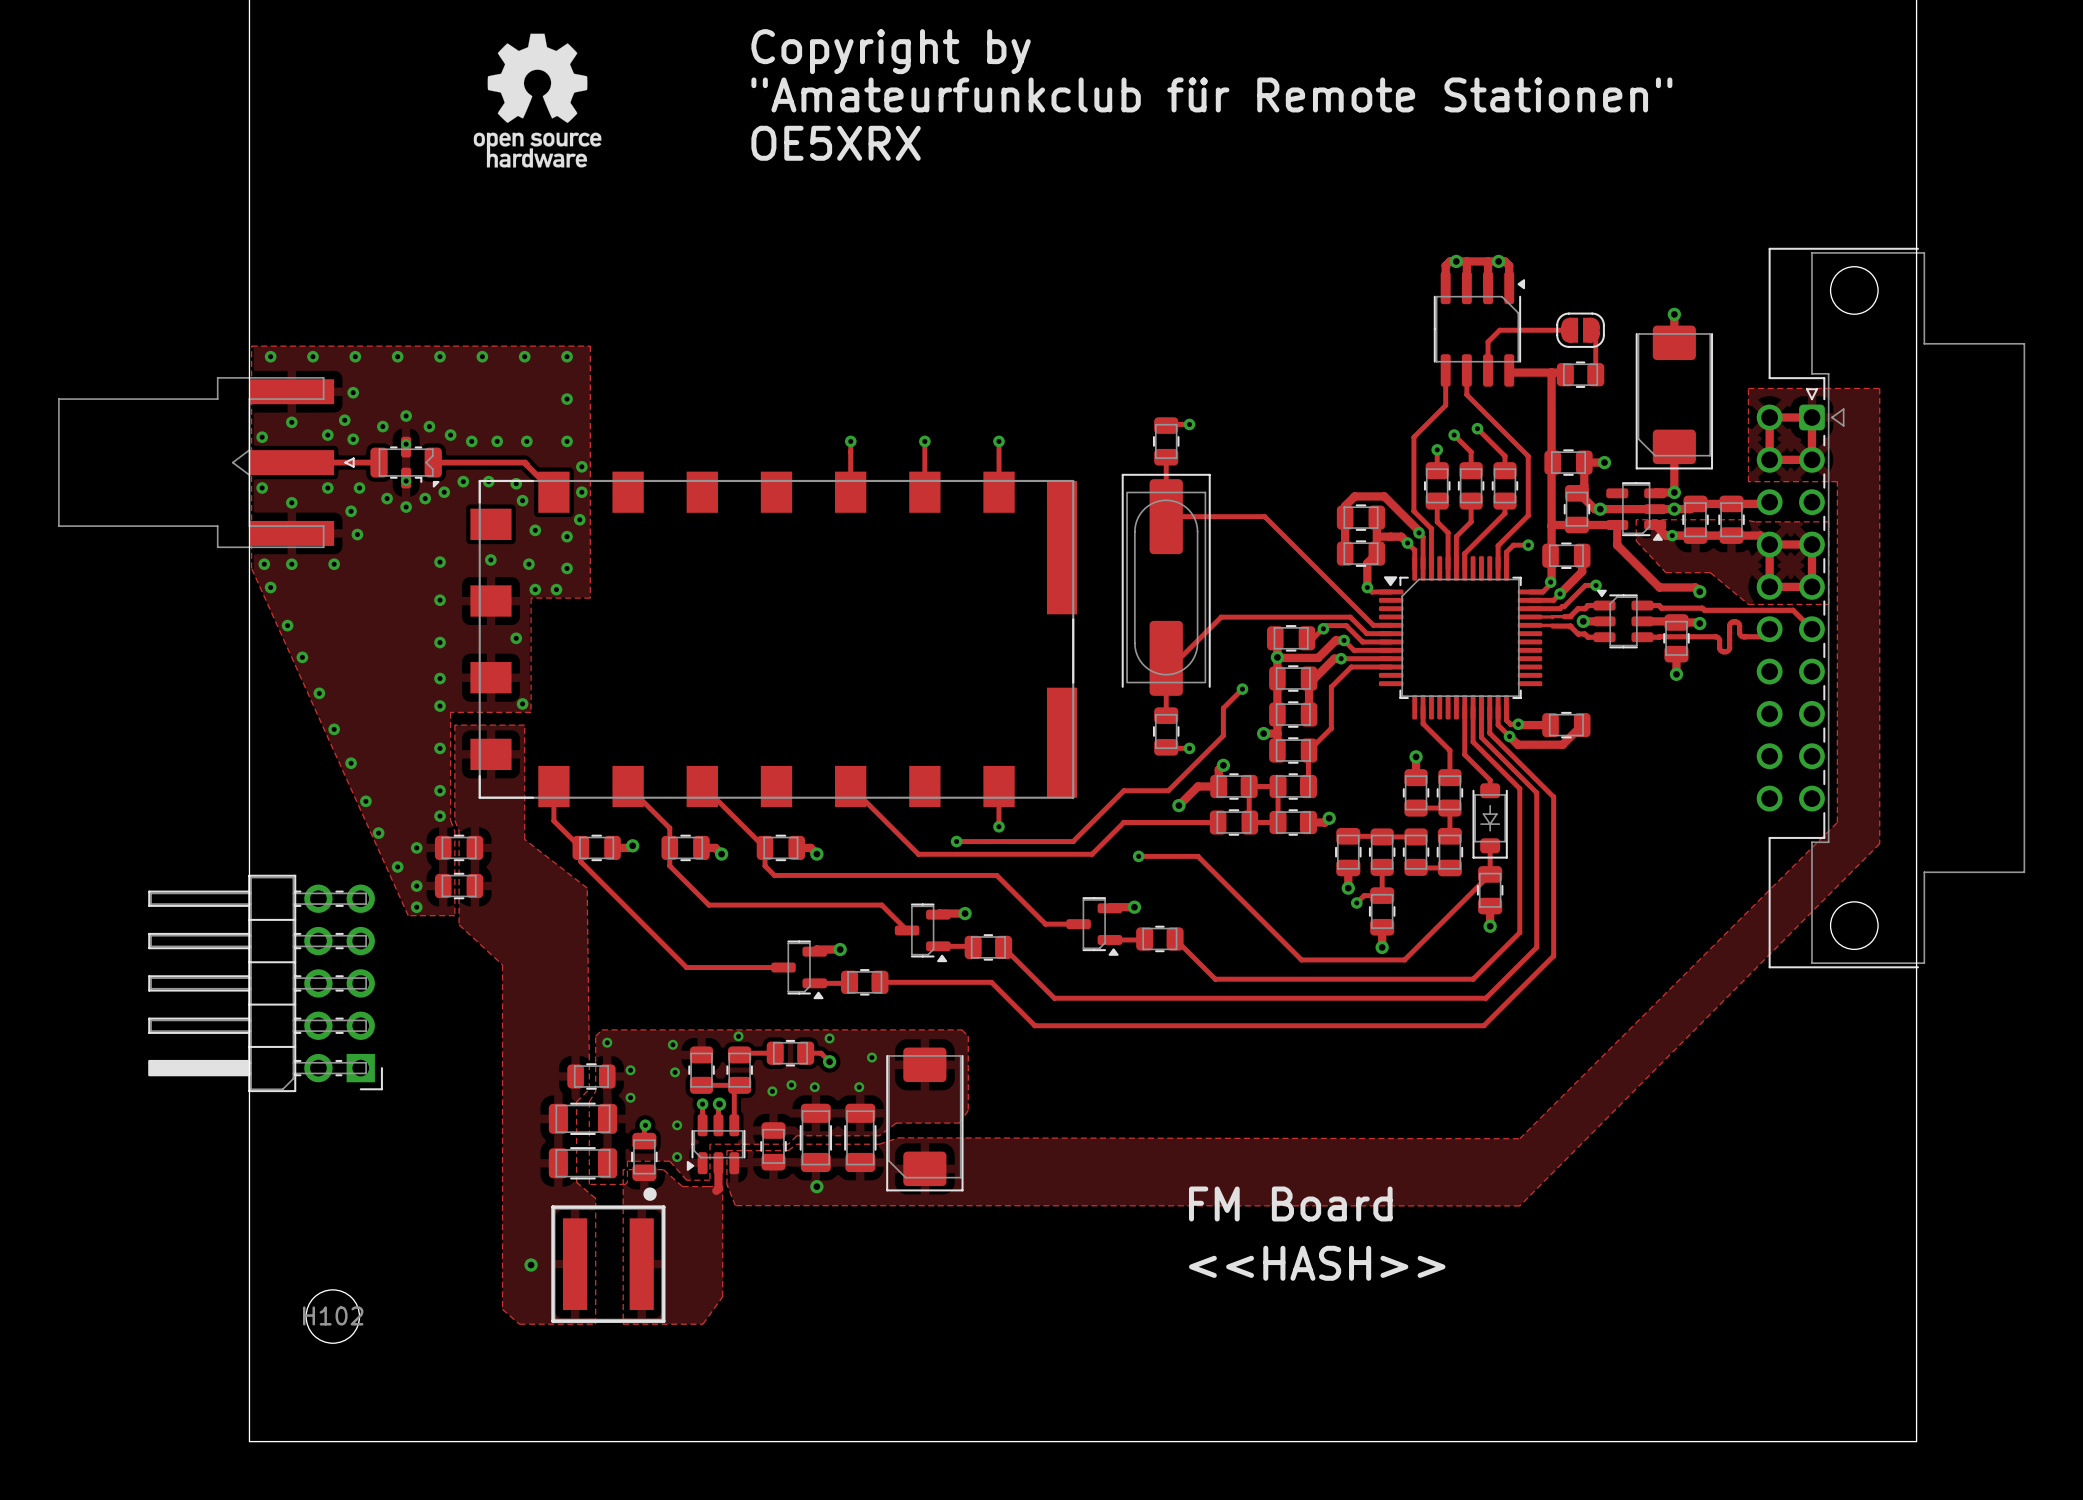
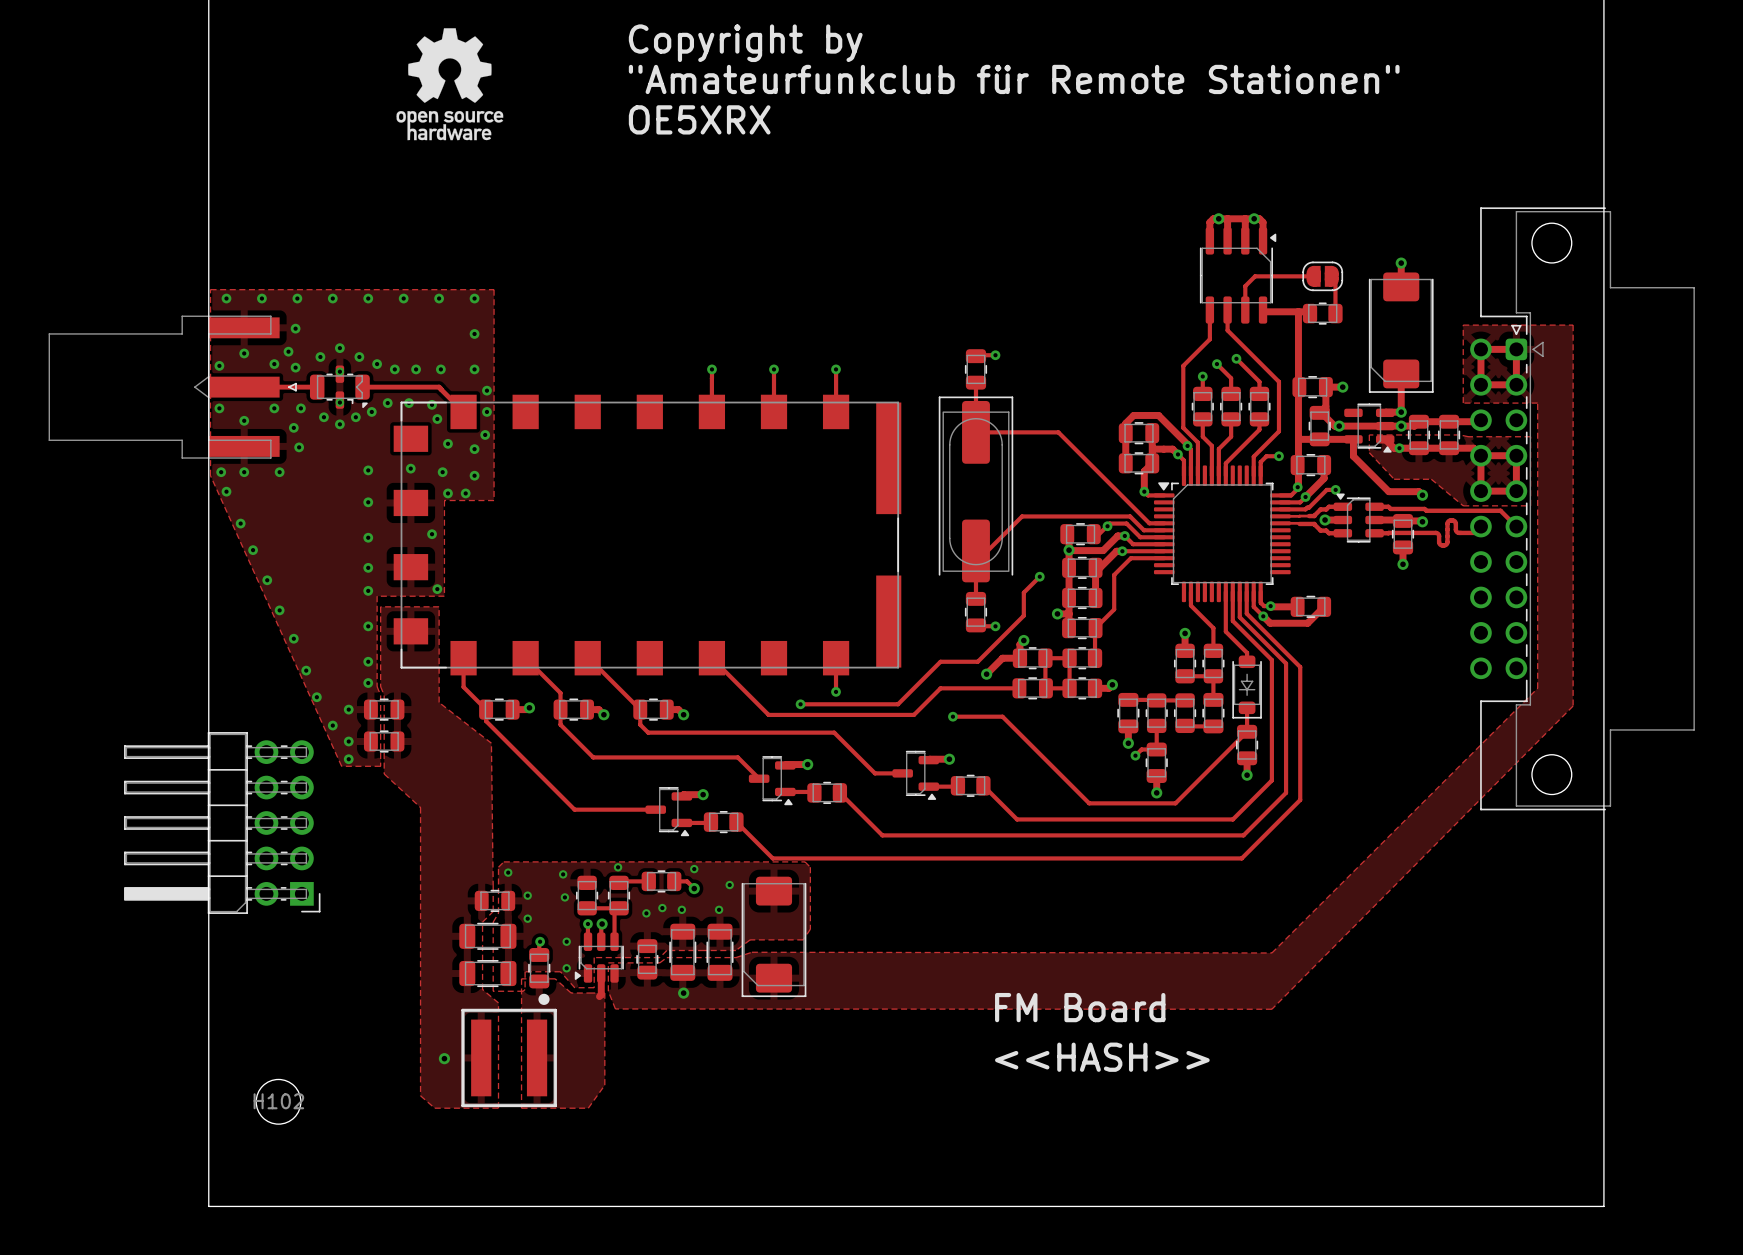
track: (879, 982) (991, 982) (1034, 1025) -> (736, 822) (772, 858) (866, 858)

